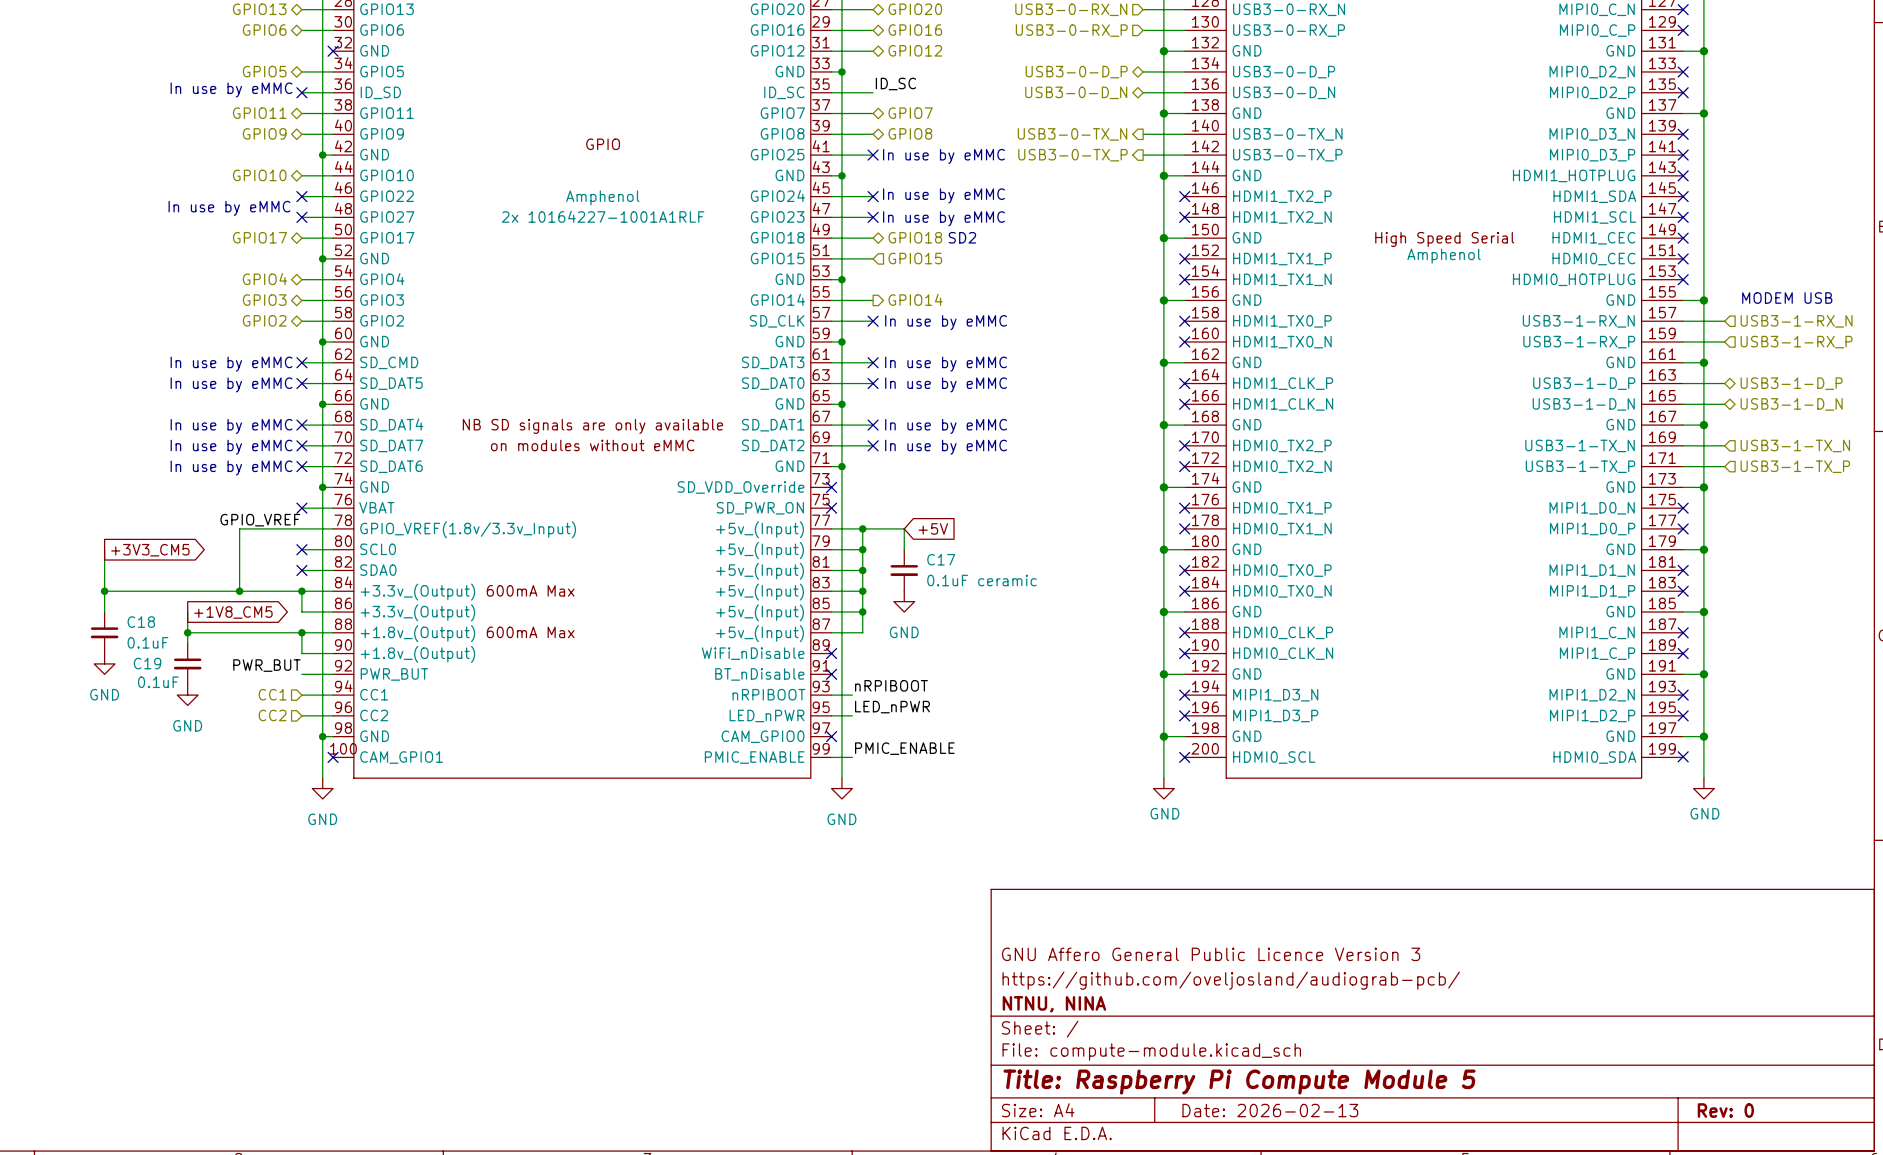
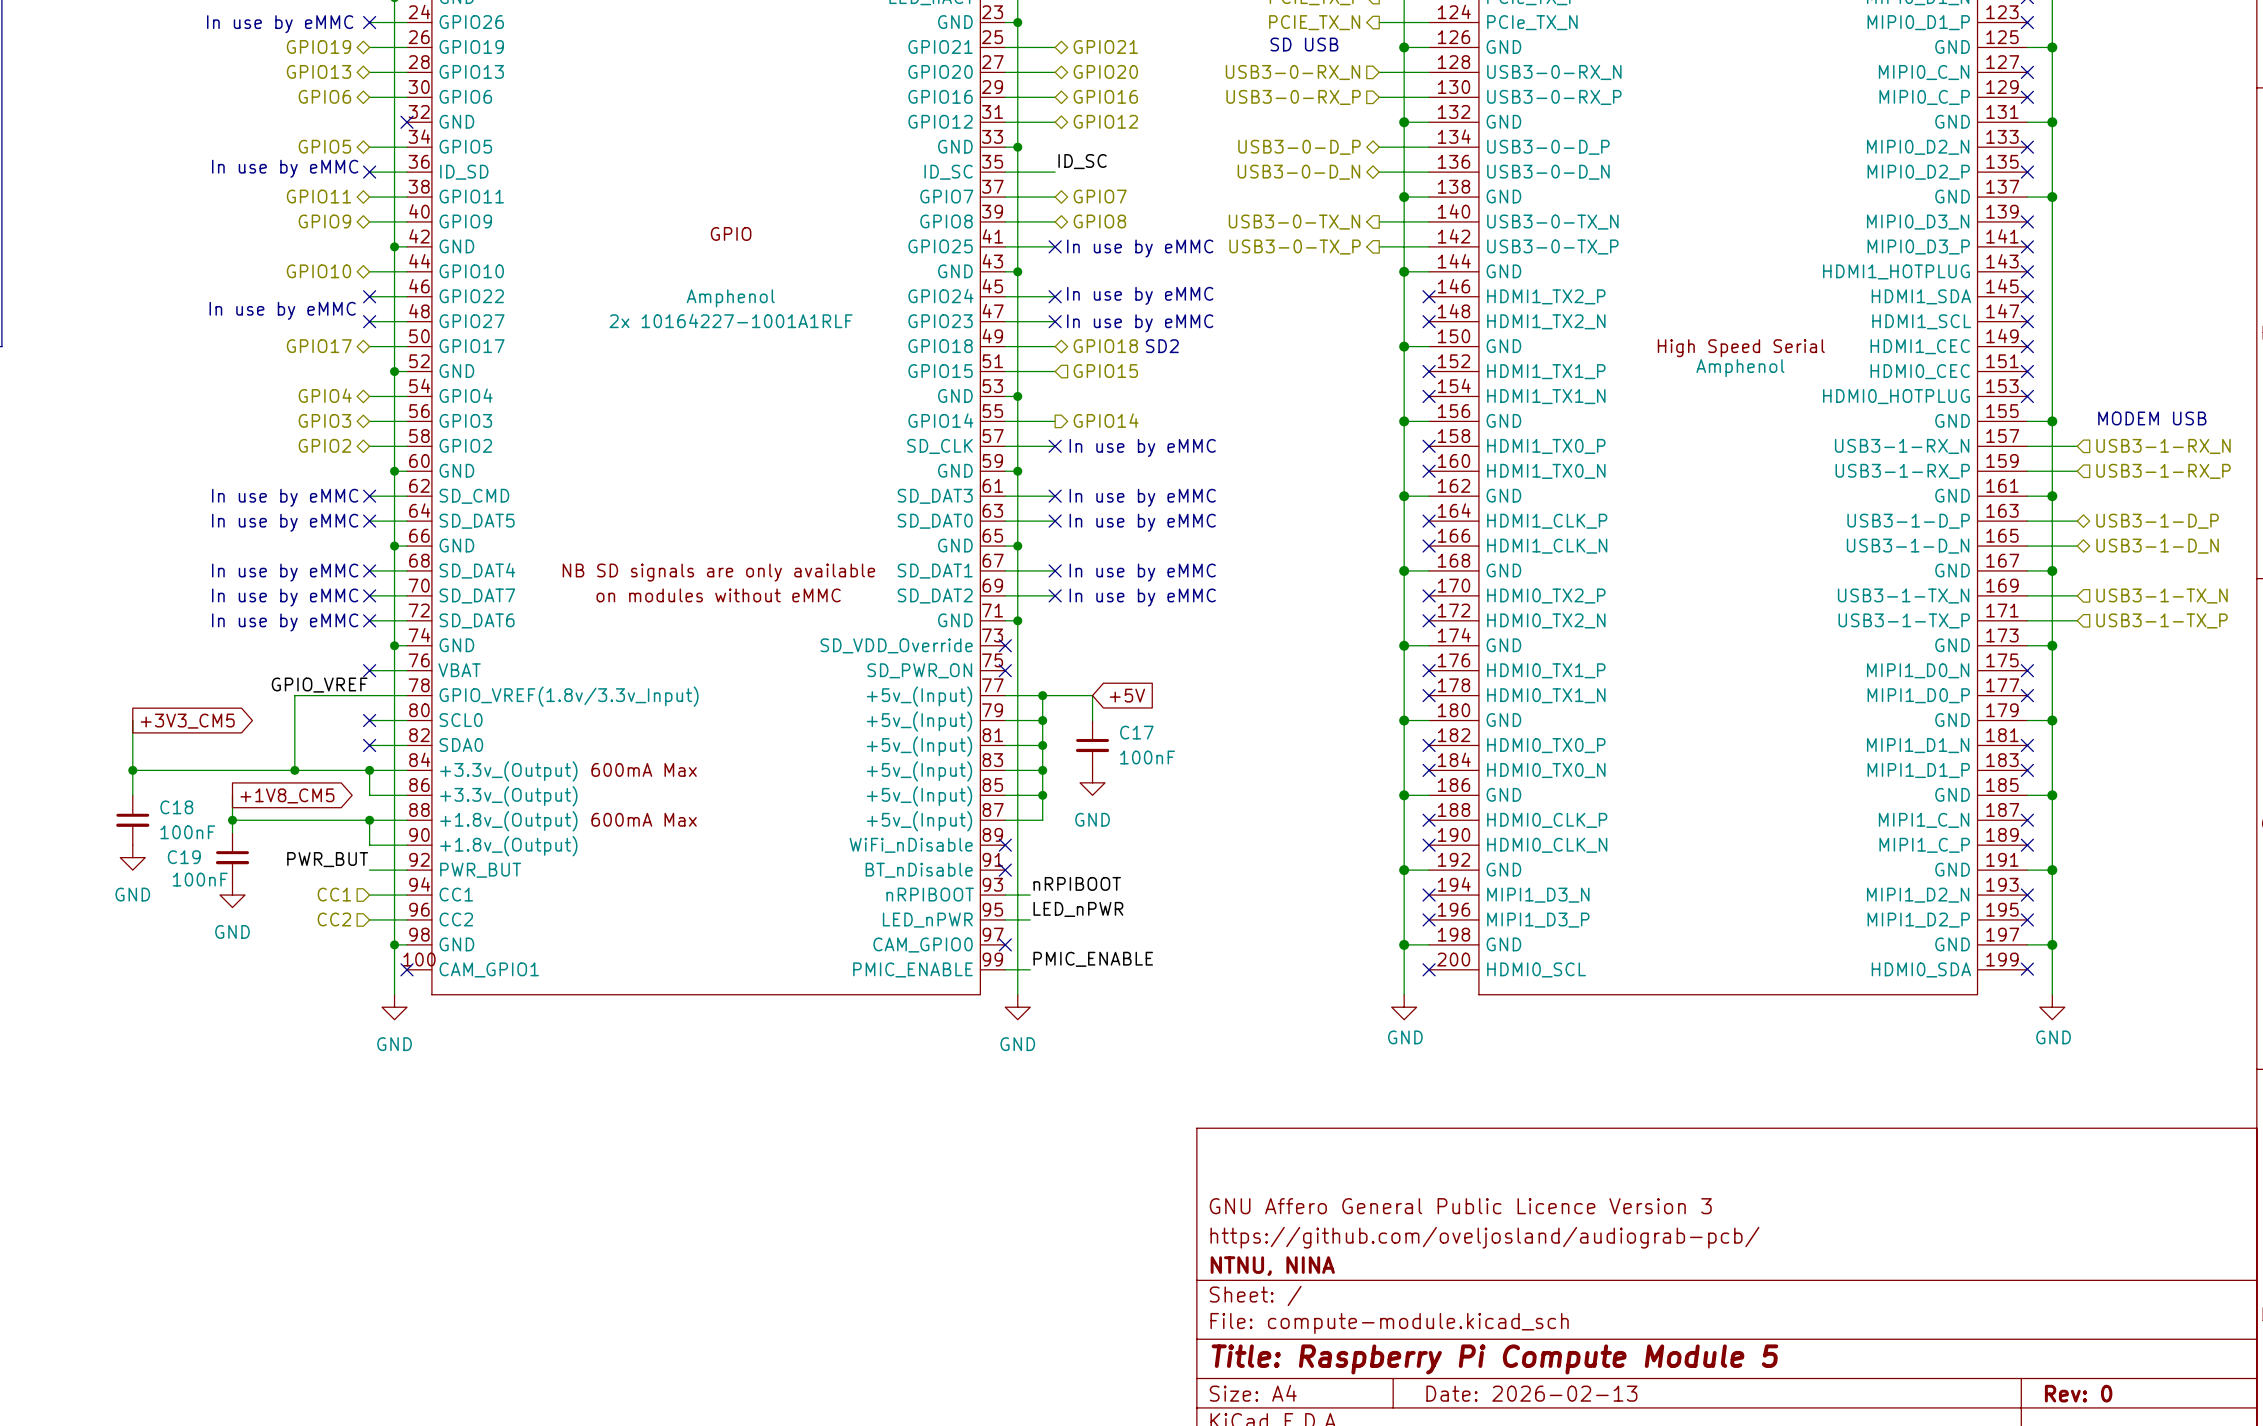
C17 value: 0.1uF ceramic (981, 580) -> 100nF (1147, 757)
C18 value: 0.1uF (147, 642) -> 100nF (187, 832)
C19 value: 0.1uF (158, 682) -> 100nF (200, 879)

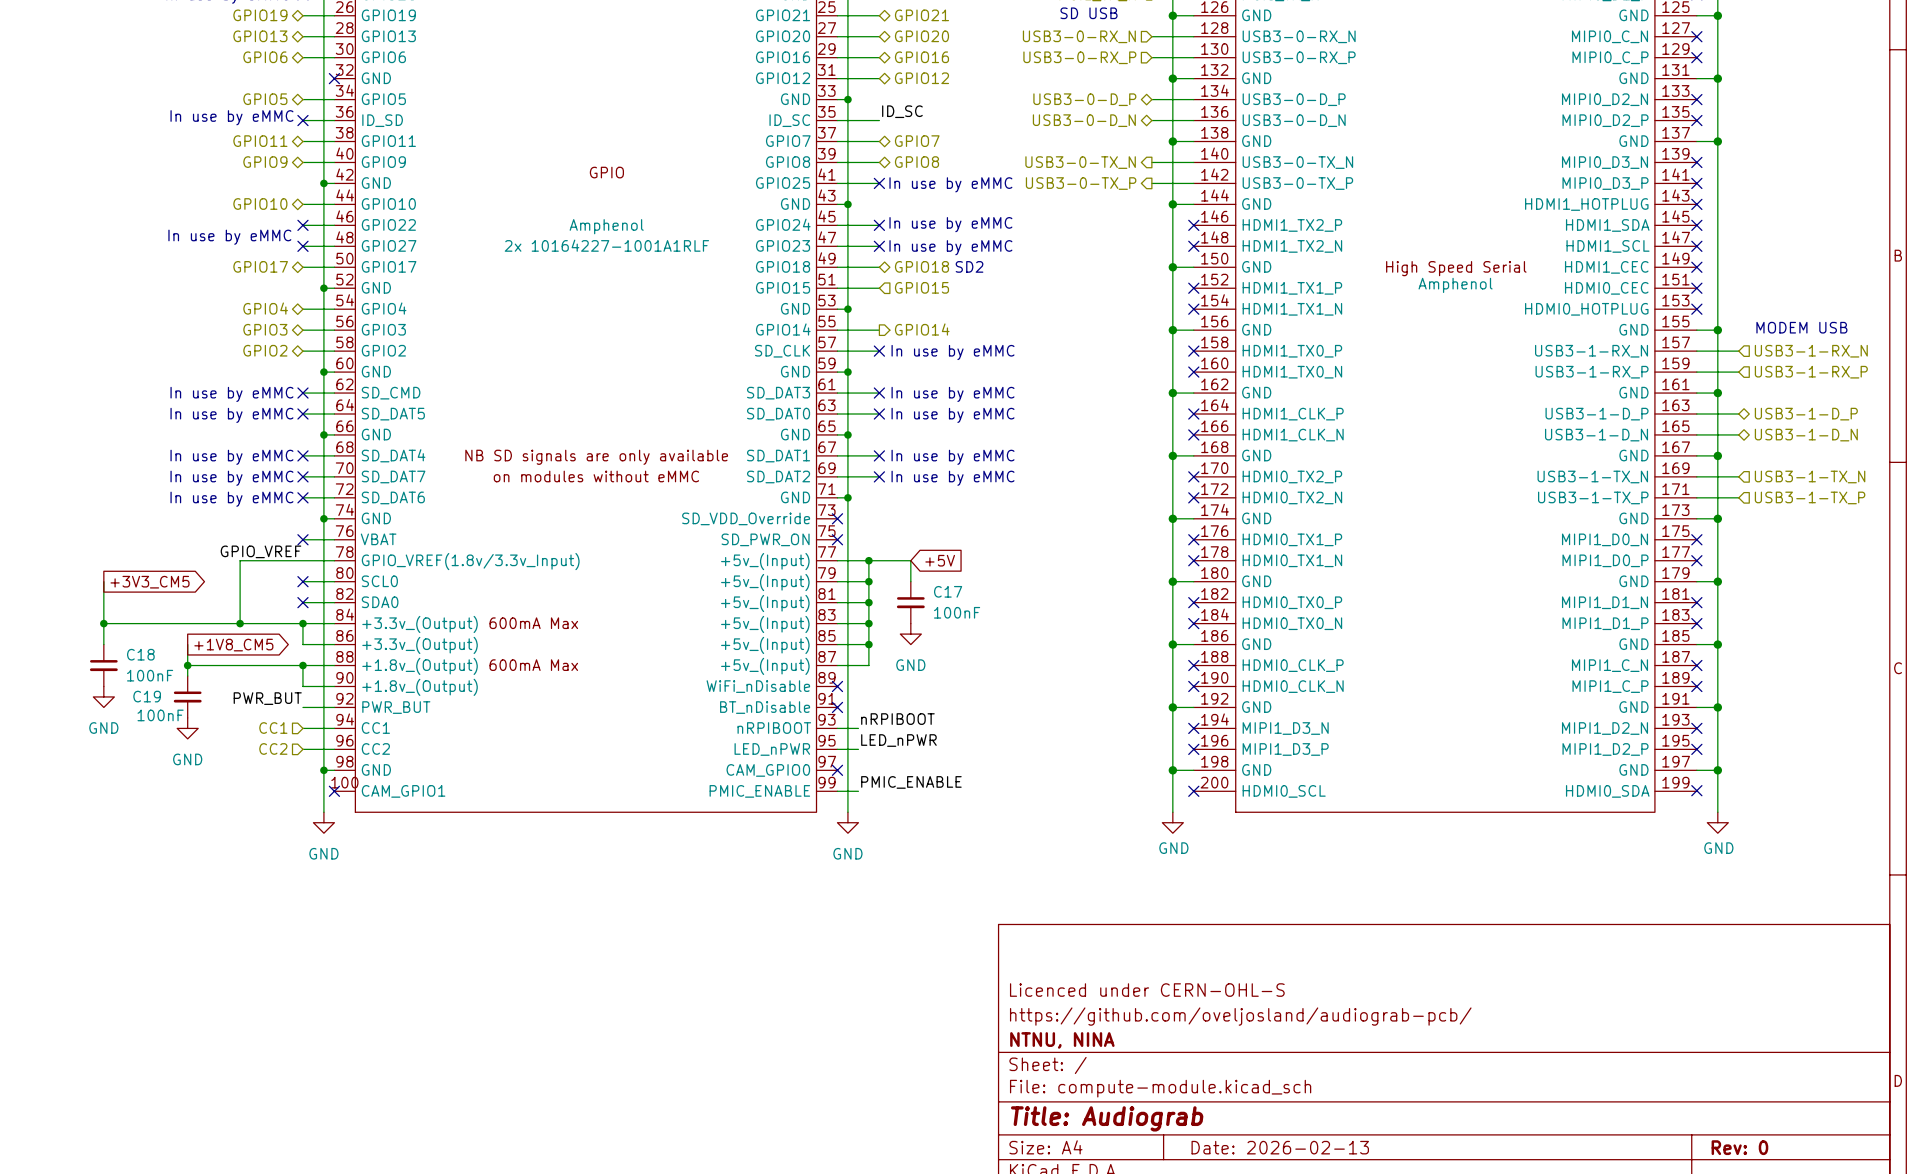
title block: GNU Affero General Public Licence Version 3 (1460, 1206) -> Licenced under CERN-OHL-S (1147, 990)
title block: Title: Raspberry Pi Compute Module 5 (1494, 1359) -> Title: Audiograb (1107, 1118)

